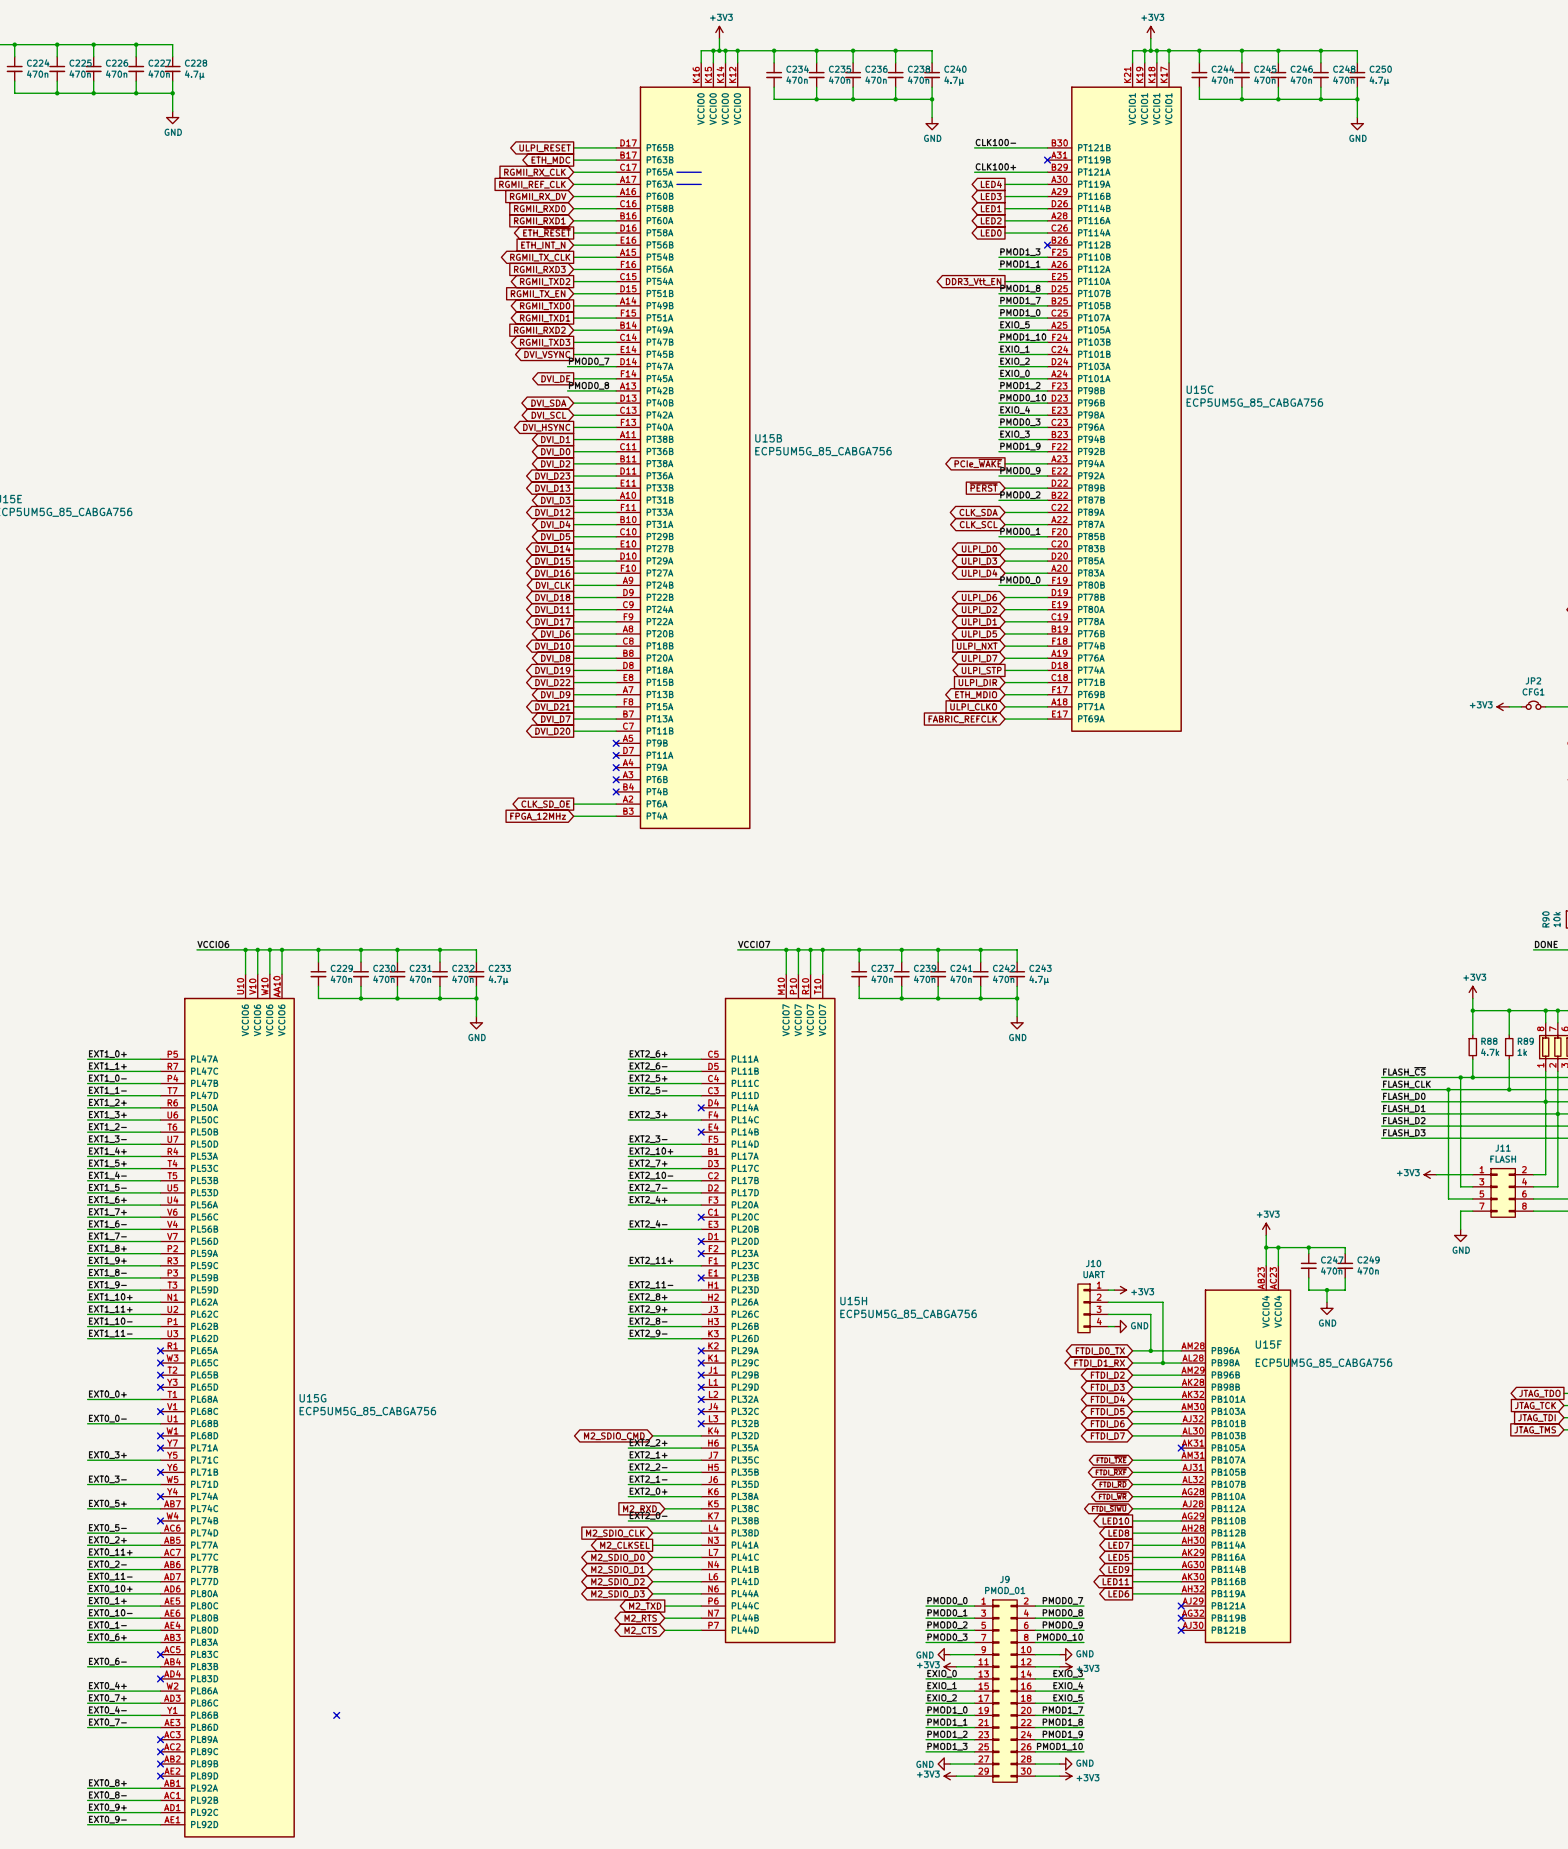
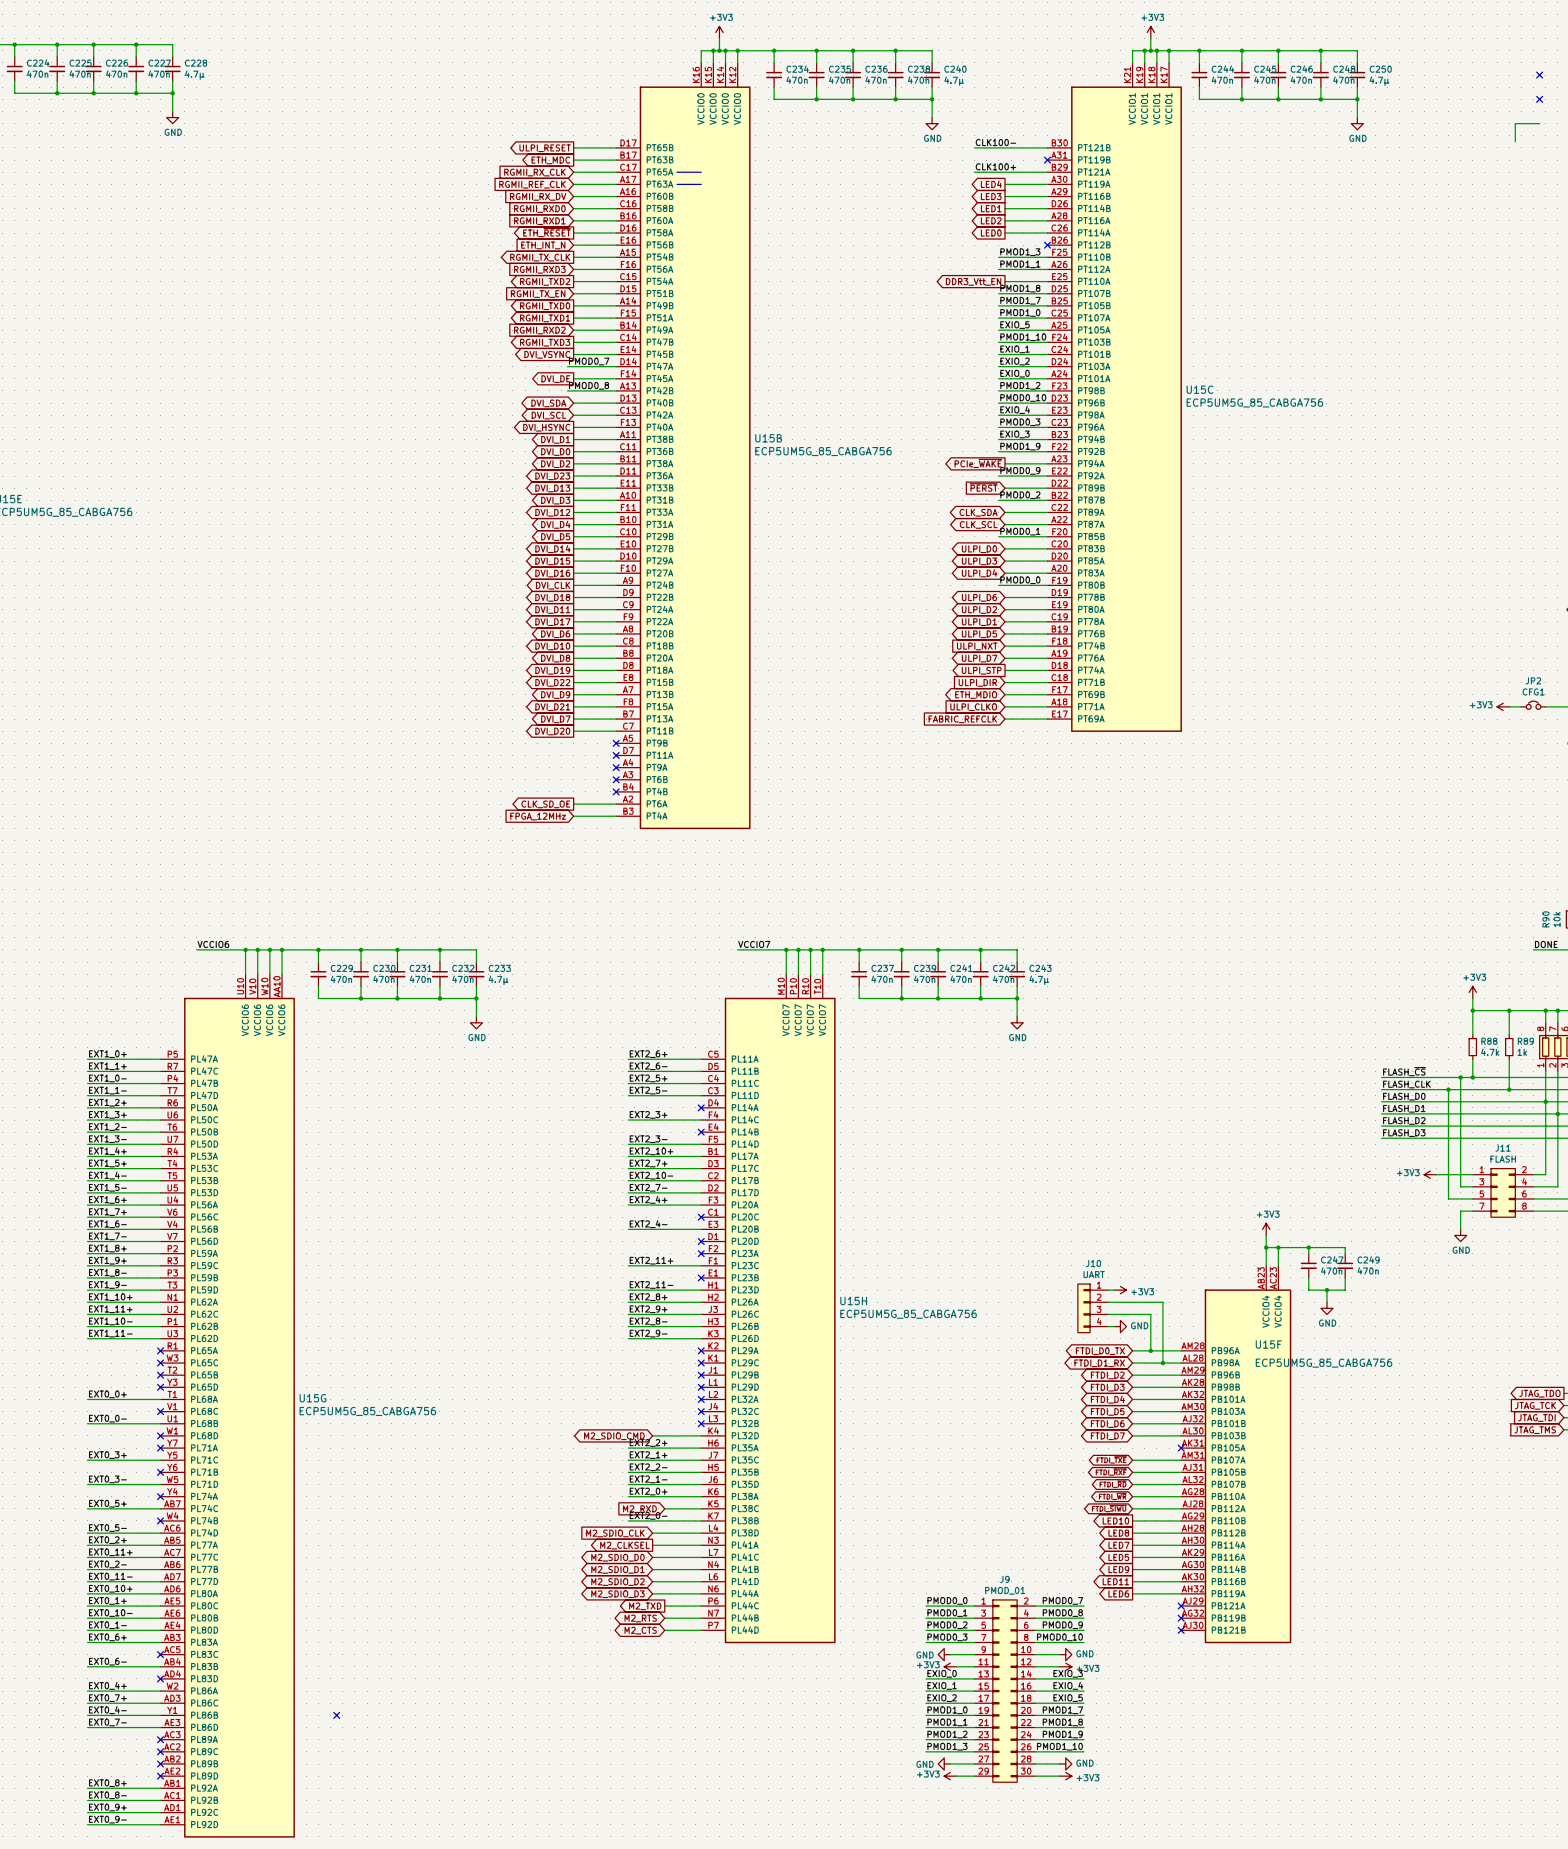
no-connect mark: none -> (1539, 75)
no-connect mark: none -> (1539, 99)
wire: none -> (1539, 123) (1515, 123) (1515, 141)

